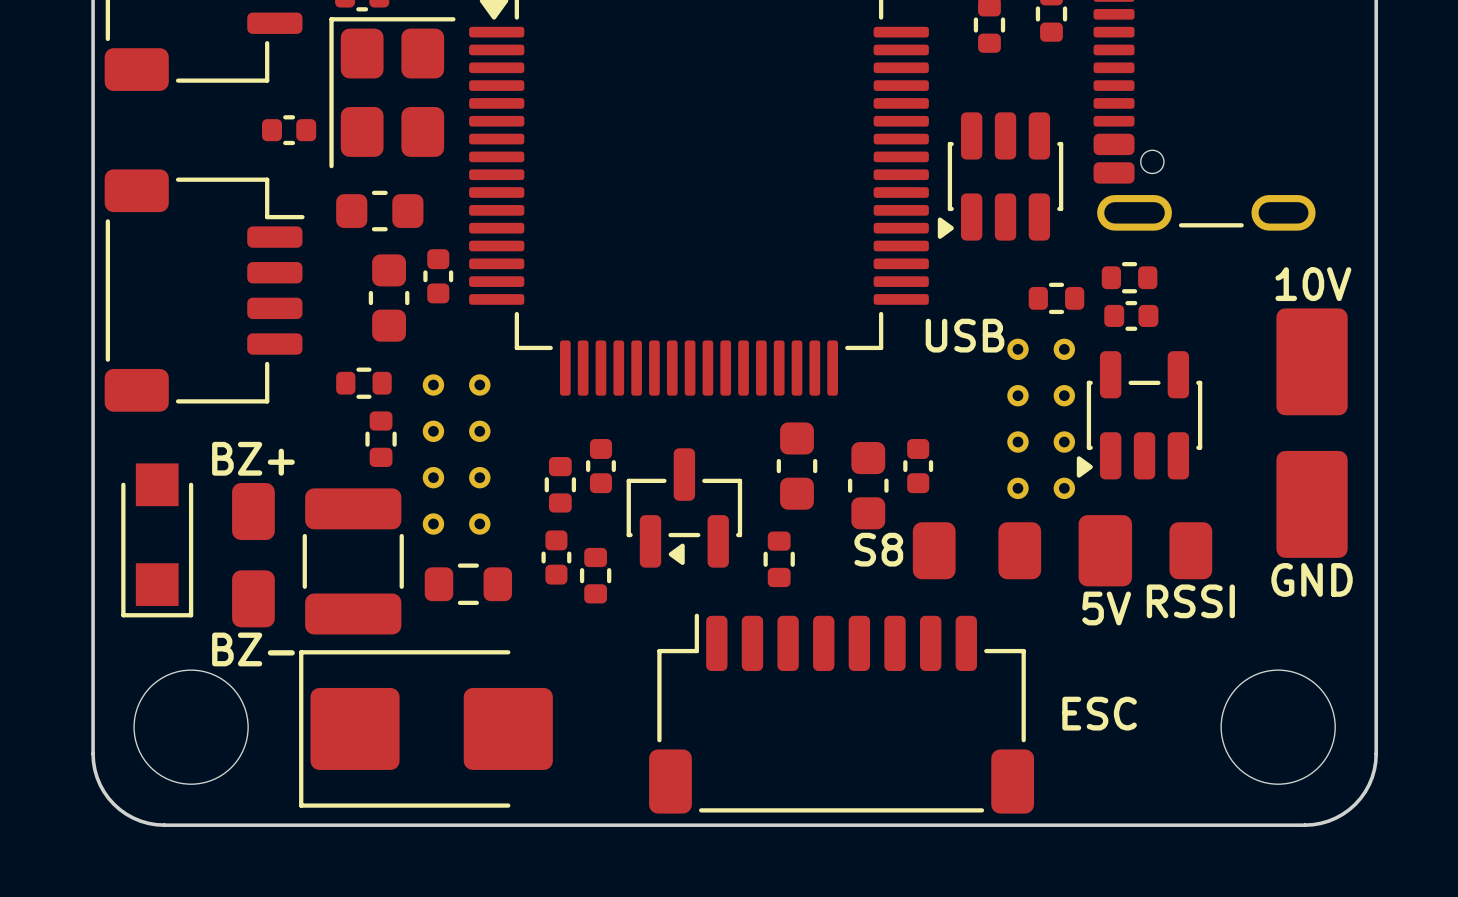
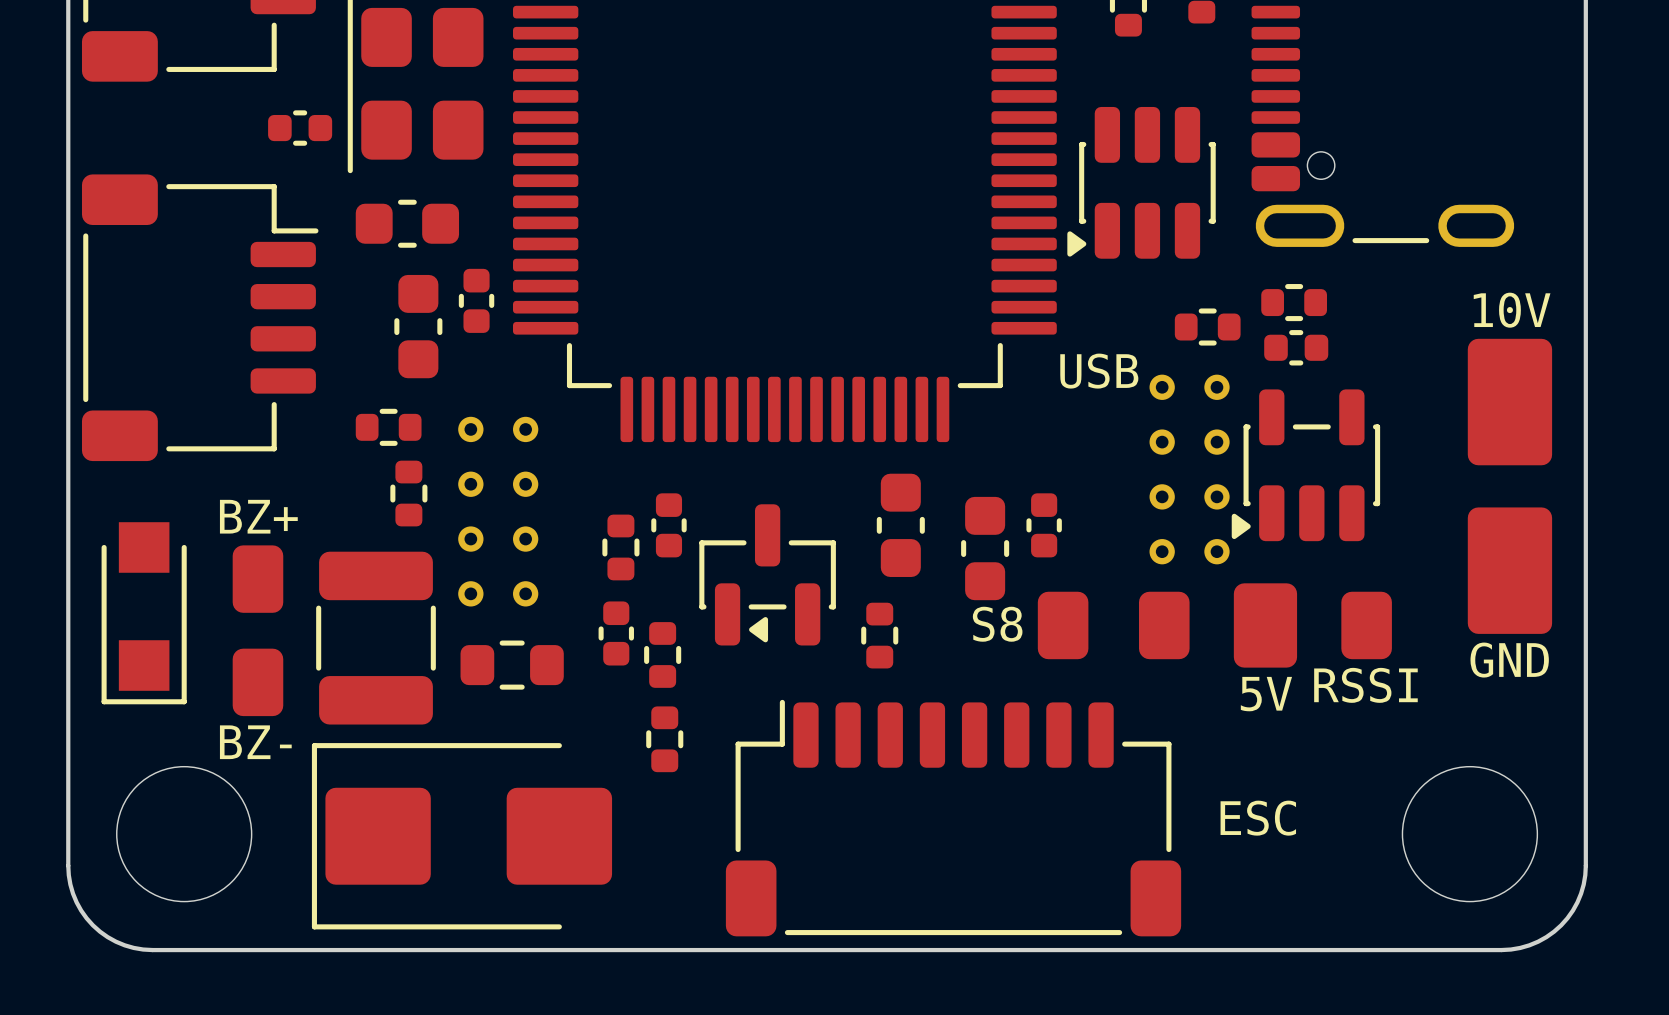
part: none -> (664, 739)

